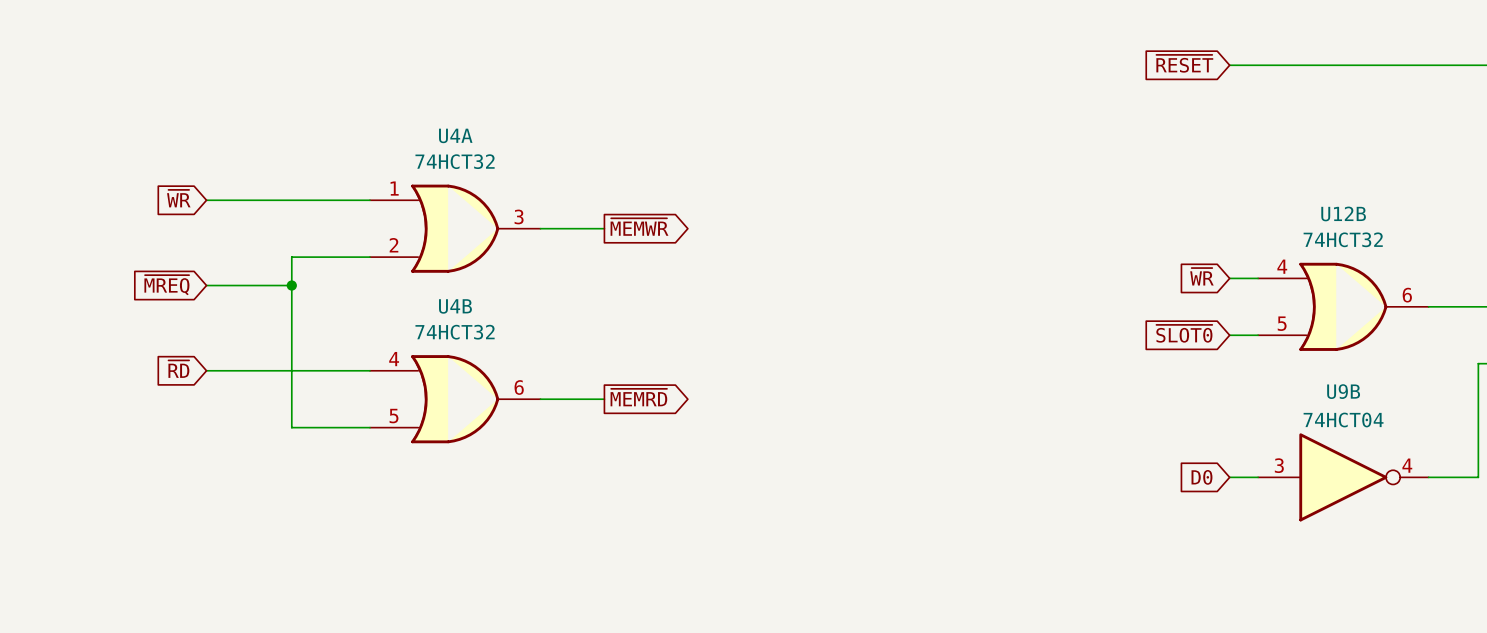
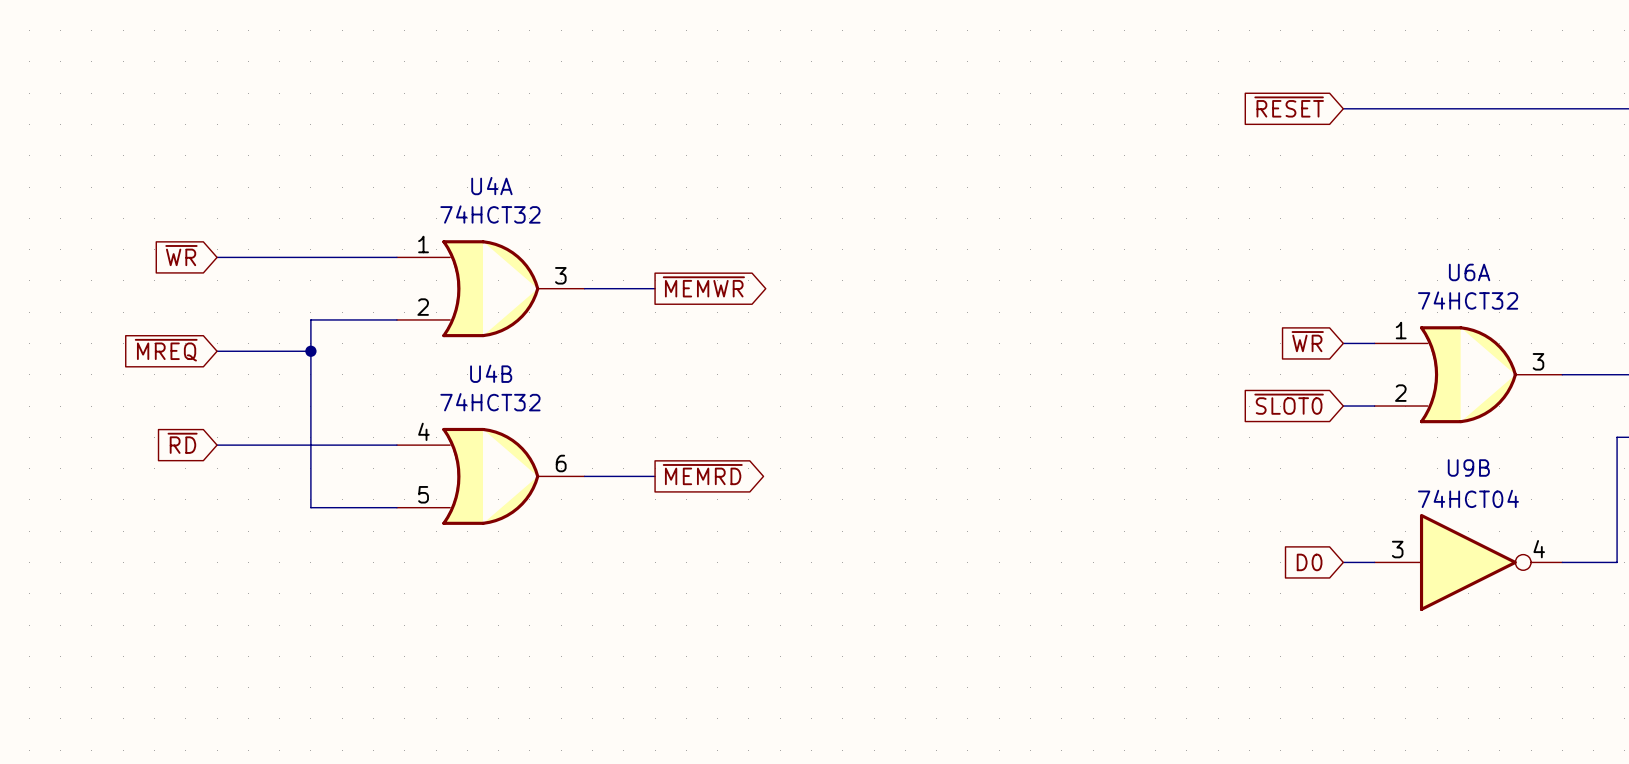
U12B name: U12B (1343, 213) -> U6A (1469, 272)
U12B pin number: 4 (1282, 266) -> 1 (1401, 330)
U12B pin number: 6 (1407, 295) -> 3 (1538, 361)
U12B pin number: 5 (1282, 323) -> 2 (1400, 393)

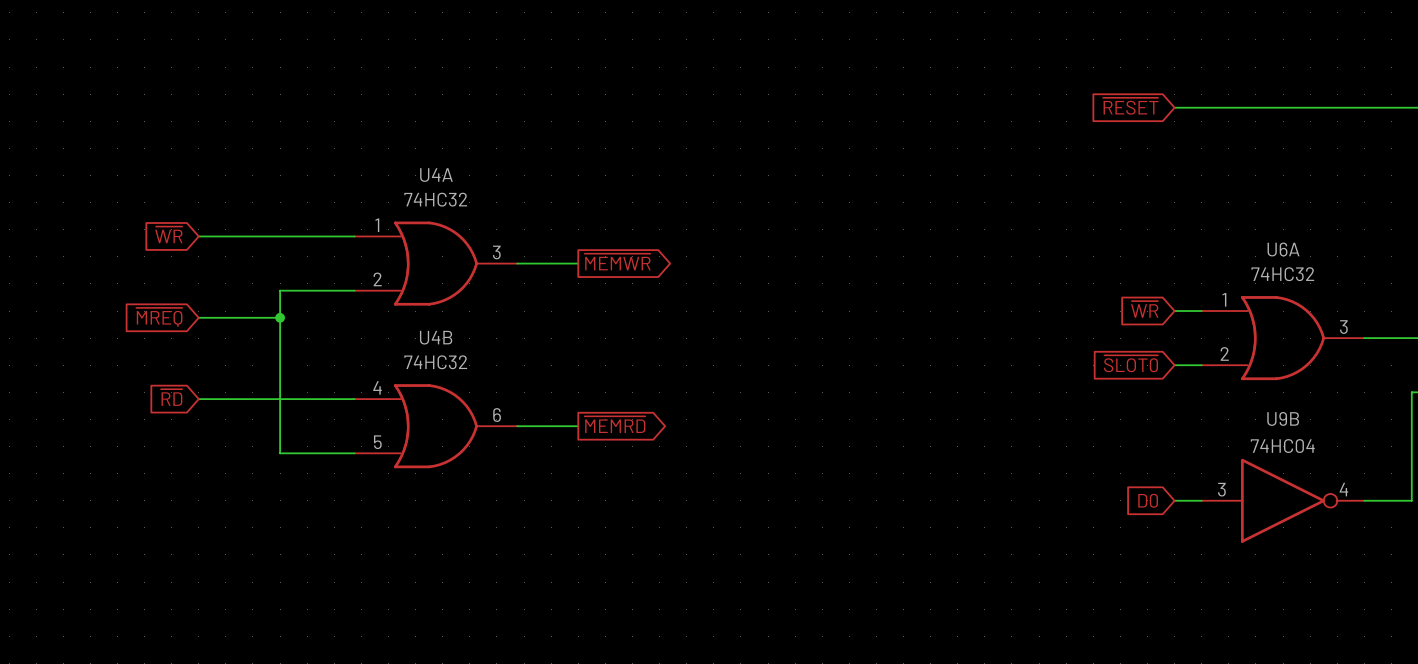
U4A value: 74HCT32 (490, 214) -> 74HC32 (435, 199)
U6A value: 74HCT32 (1468, 300) -> 74HC32 (1282, 274)
U4B value: 74HCT32 (490, 402) -> 74HC32 (435, 362)
U9B value: 74HCT04 (1468, 498) -> 74HC04 (1282, 446)

